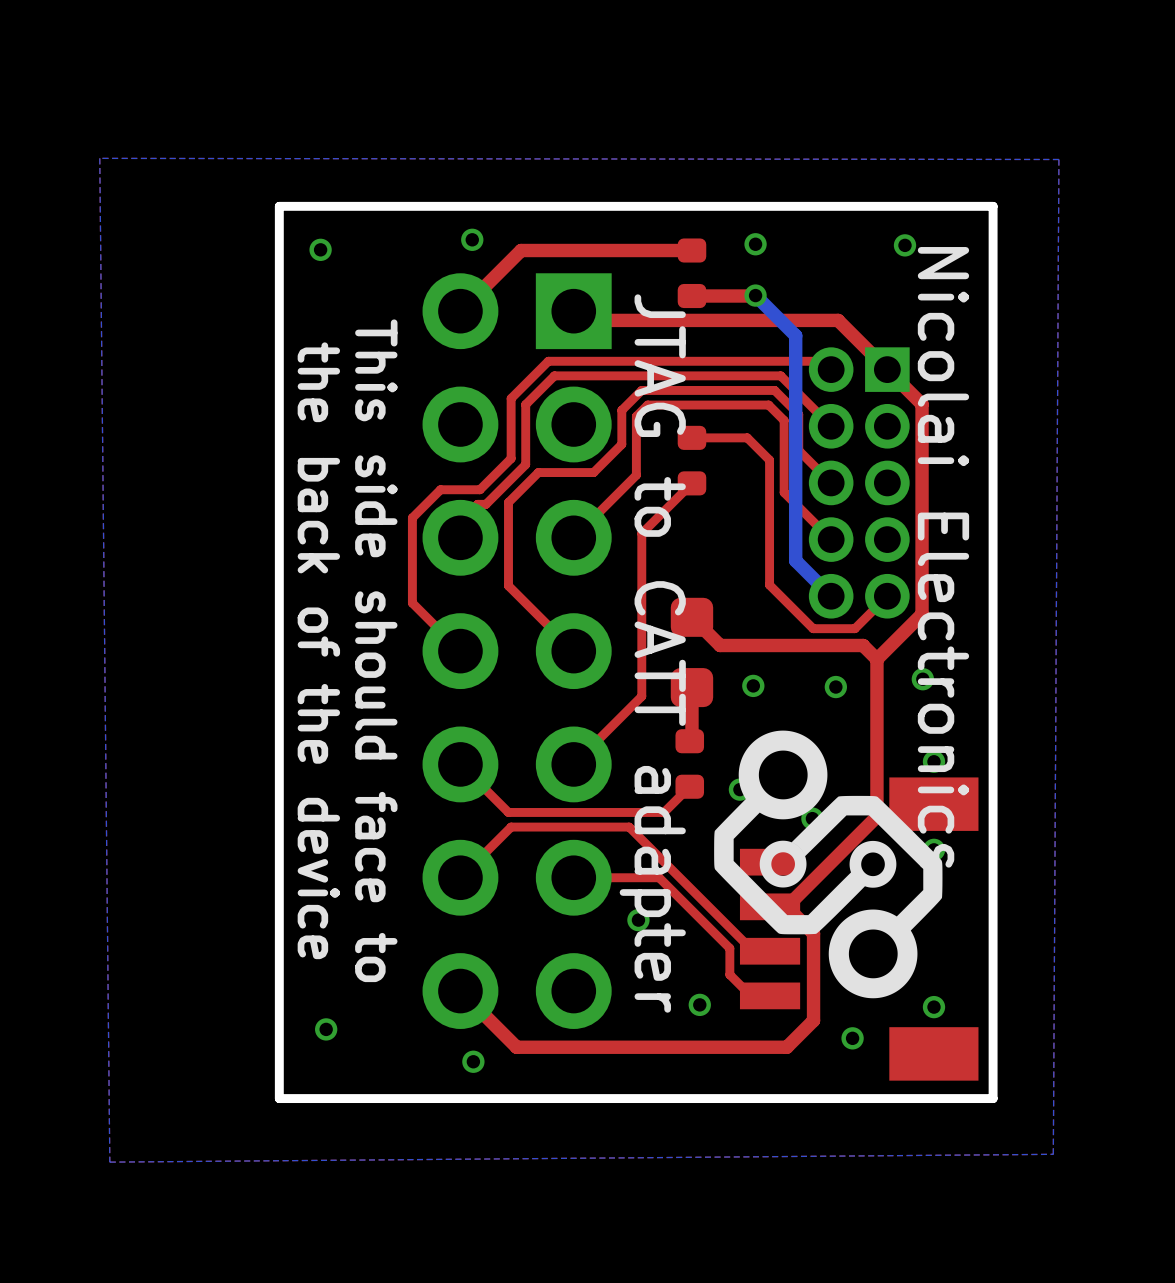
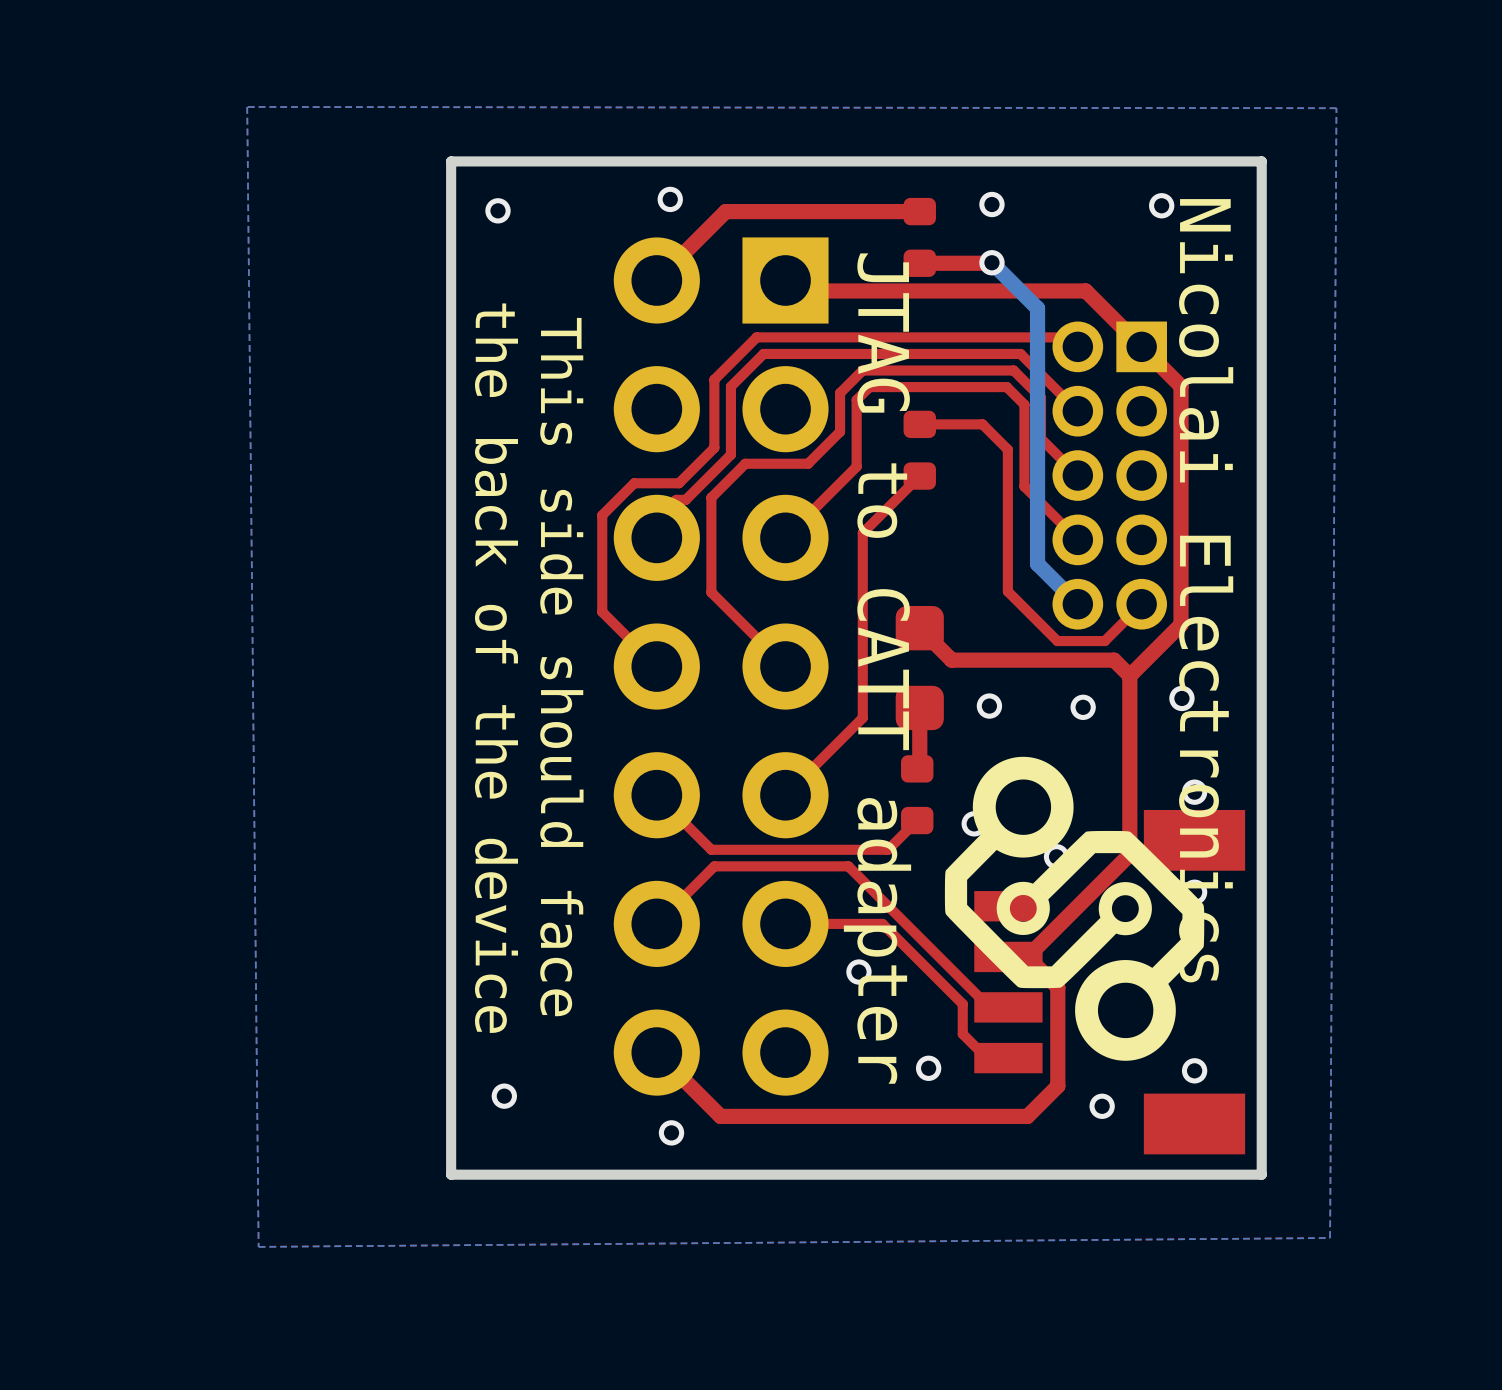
text: This side should face to (376, 650) -> This side should face (561, 667)

